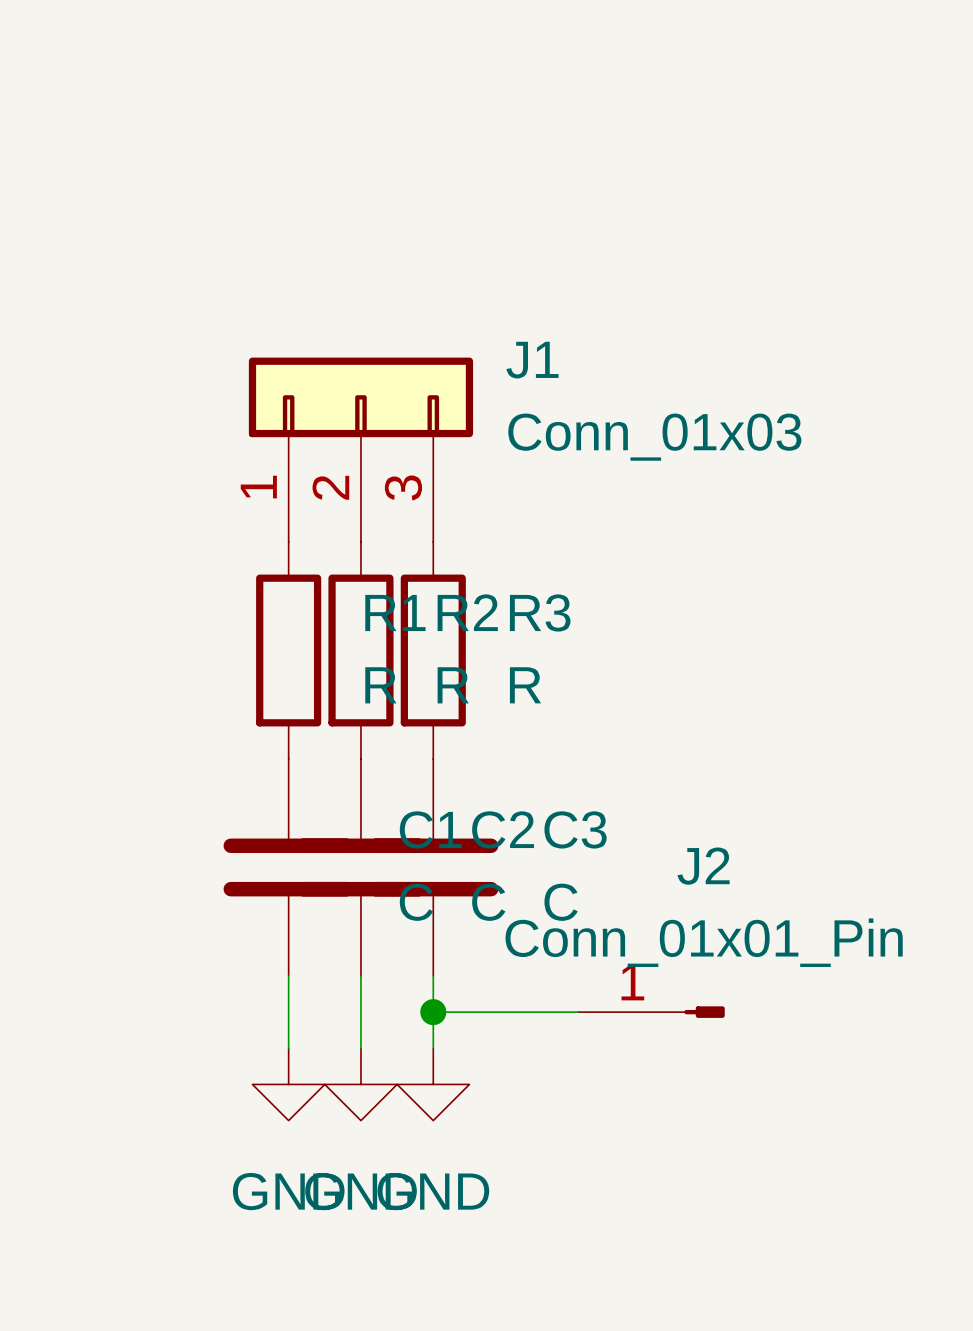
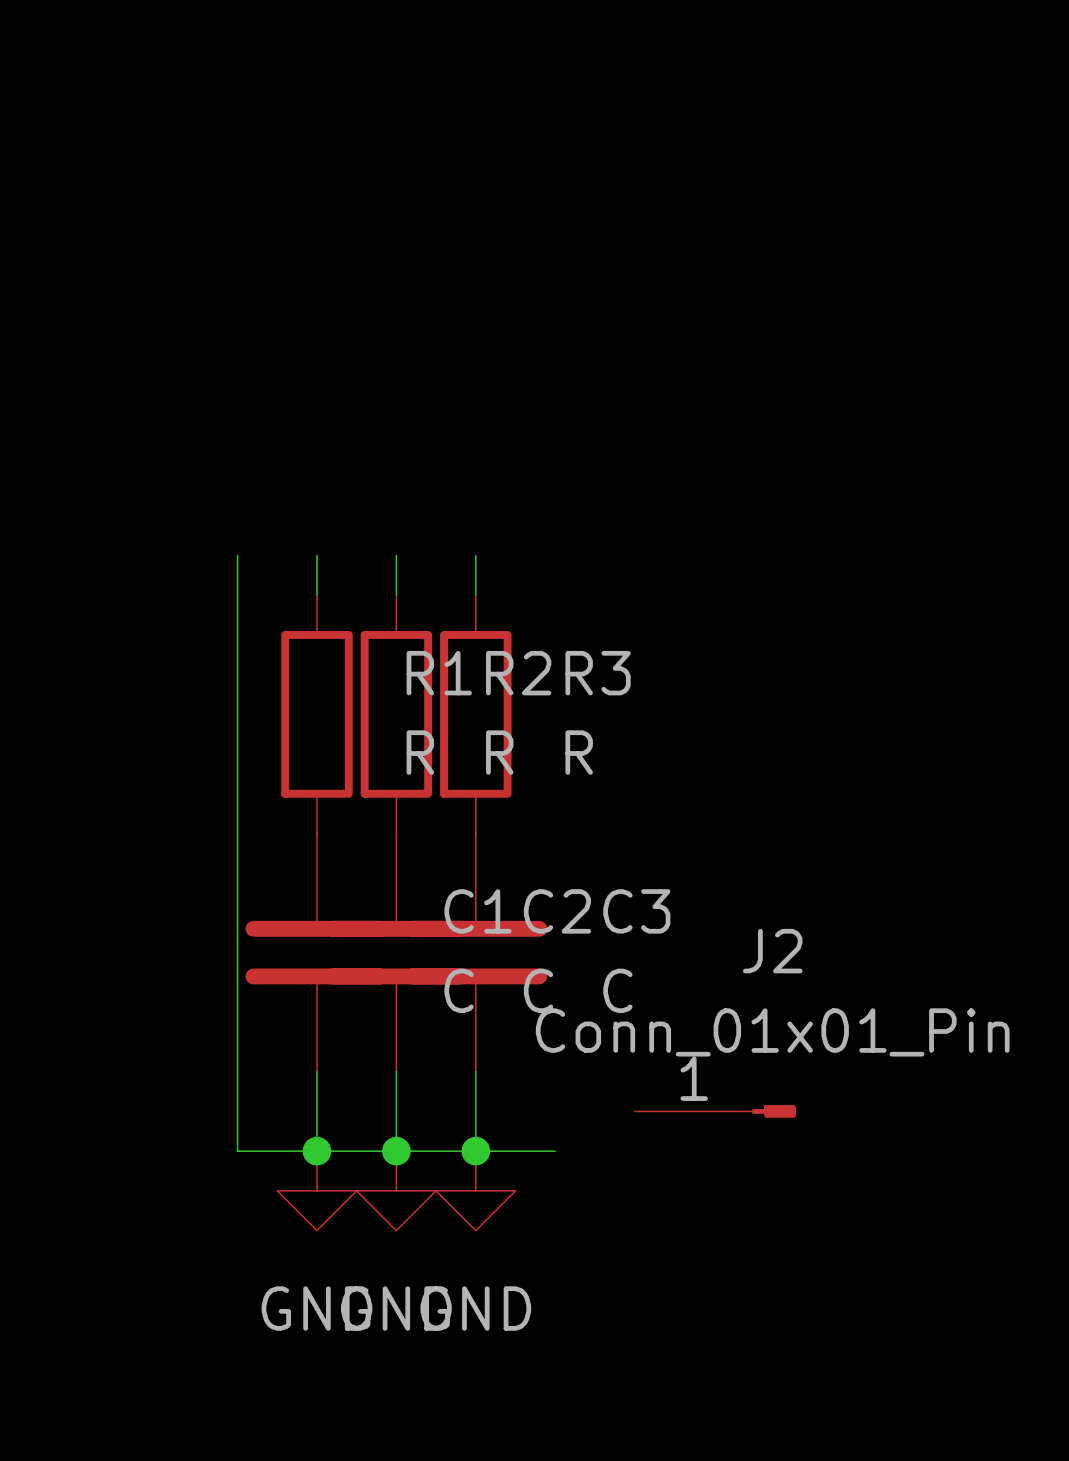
J1: Conn_01x03 (360, 449) -> none
wire: none -> (237, 555) (237, 1151) (555, 1151)
wire: (433, 1012) (577, 1012) -> none
junction position: (433, 1012) -> (475, 1151)
junction: none -> (316, 1151)
junction: none -> (396, 1151)

